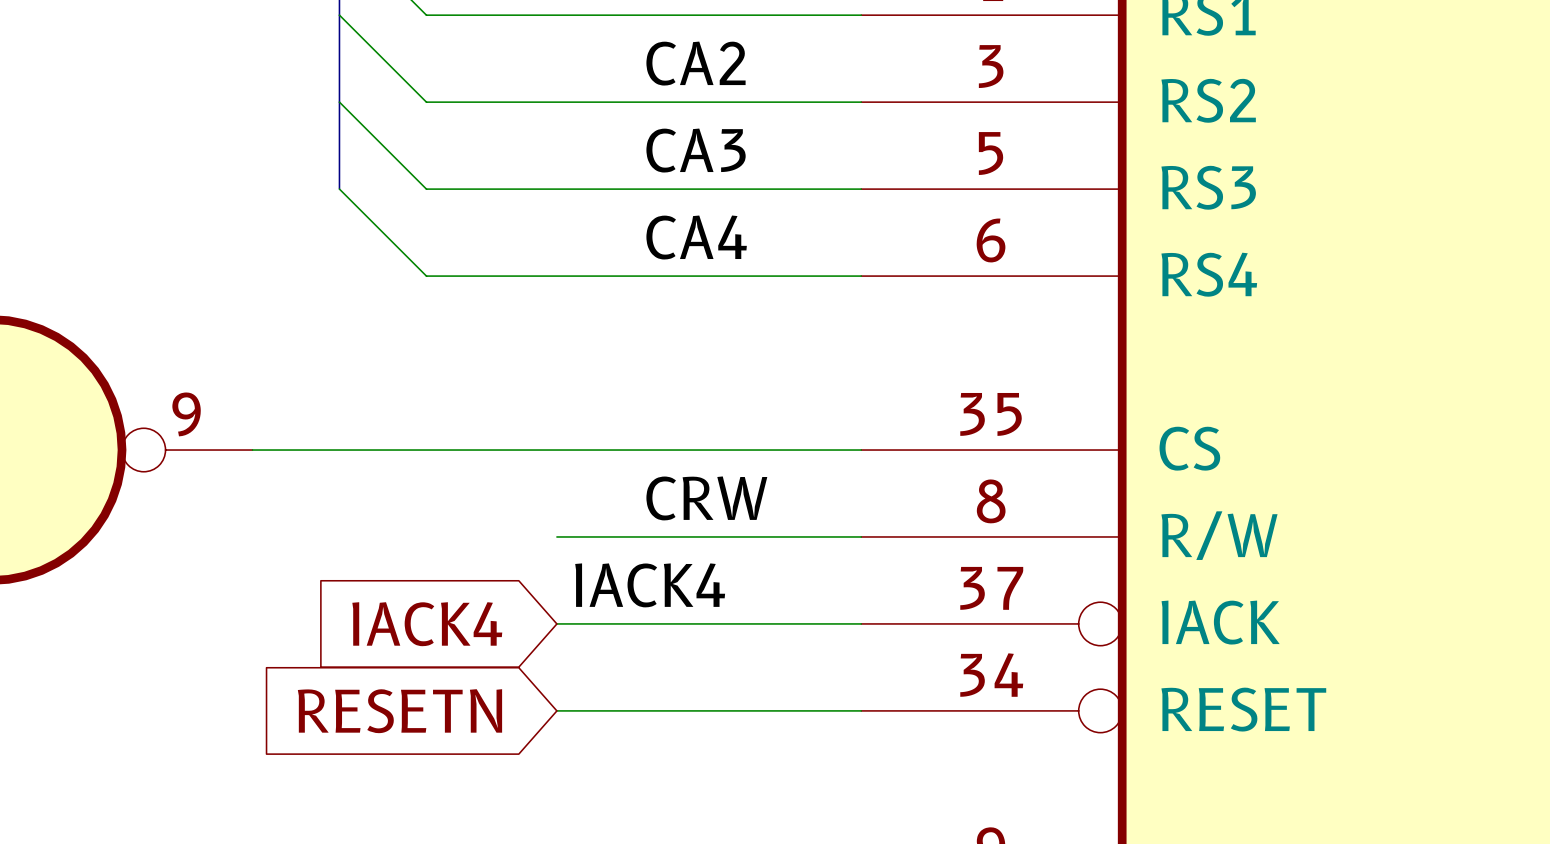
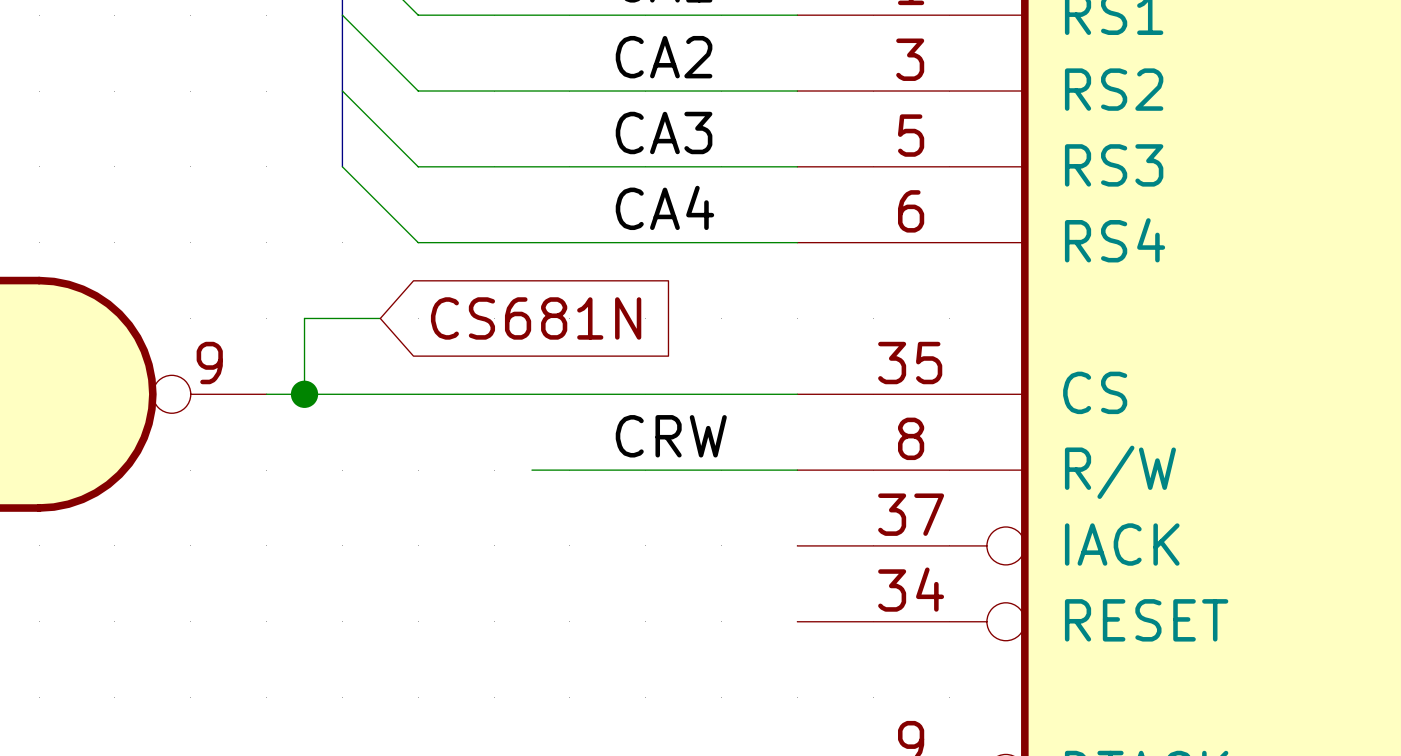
wire: none -> (380, 318) (304, 318) (304, 394)
global label: none -> CS681N (536, 318)
junction: none -> (304, 394)
label: IACK4 (650, 585) -> none
wire: (556, 623) (861, 623) -> none
global label: IACK4 (427, 624) -> none
wire: (556, 710) (861, 710) -> none
global label: RESETN (399, 711) -> none

